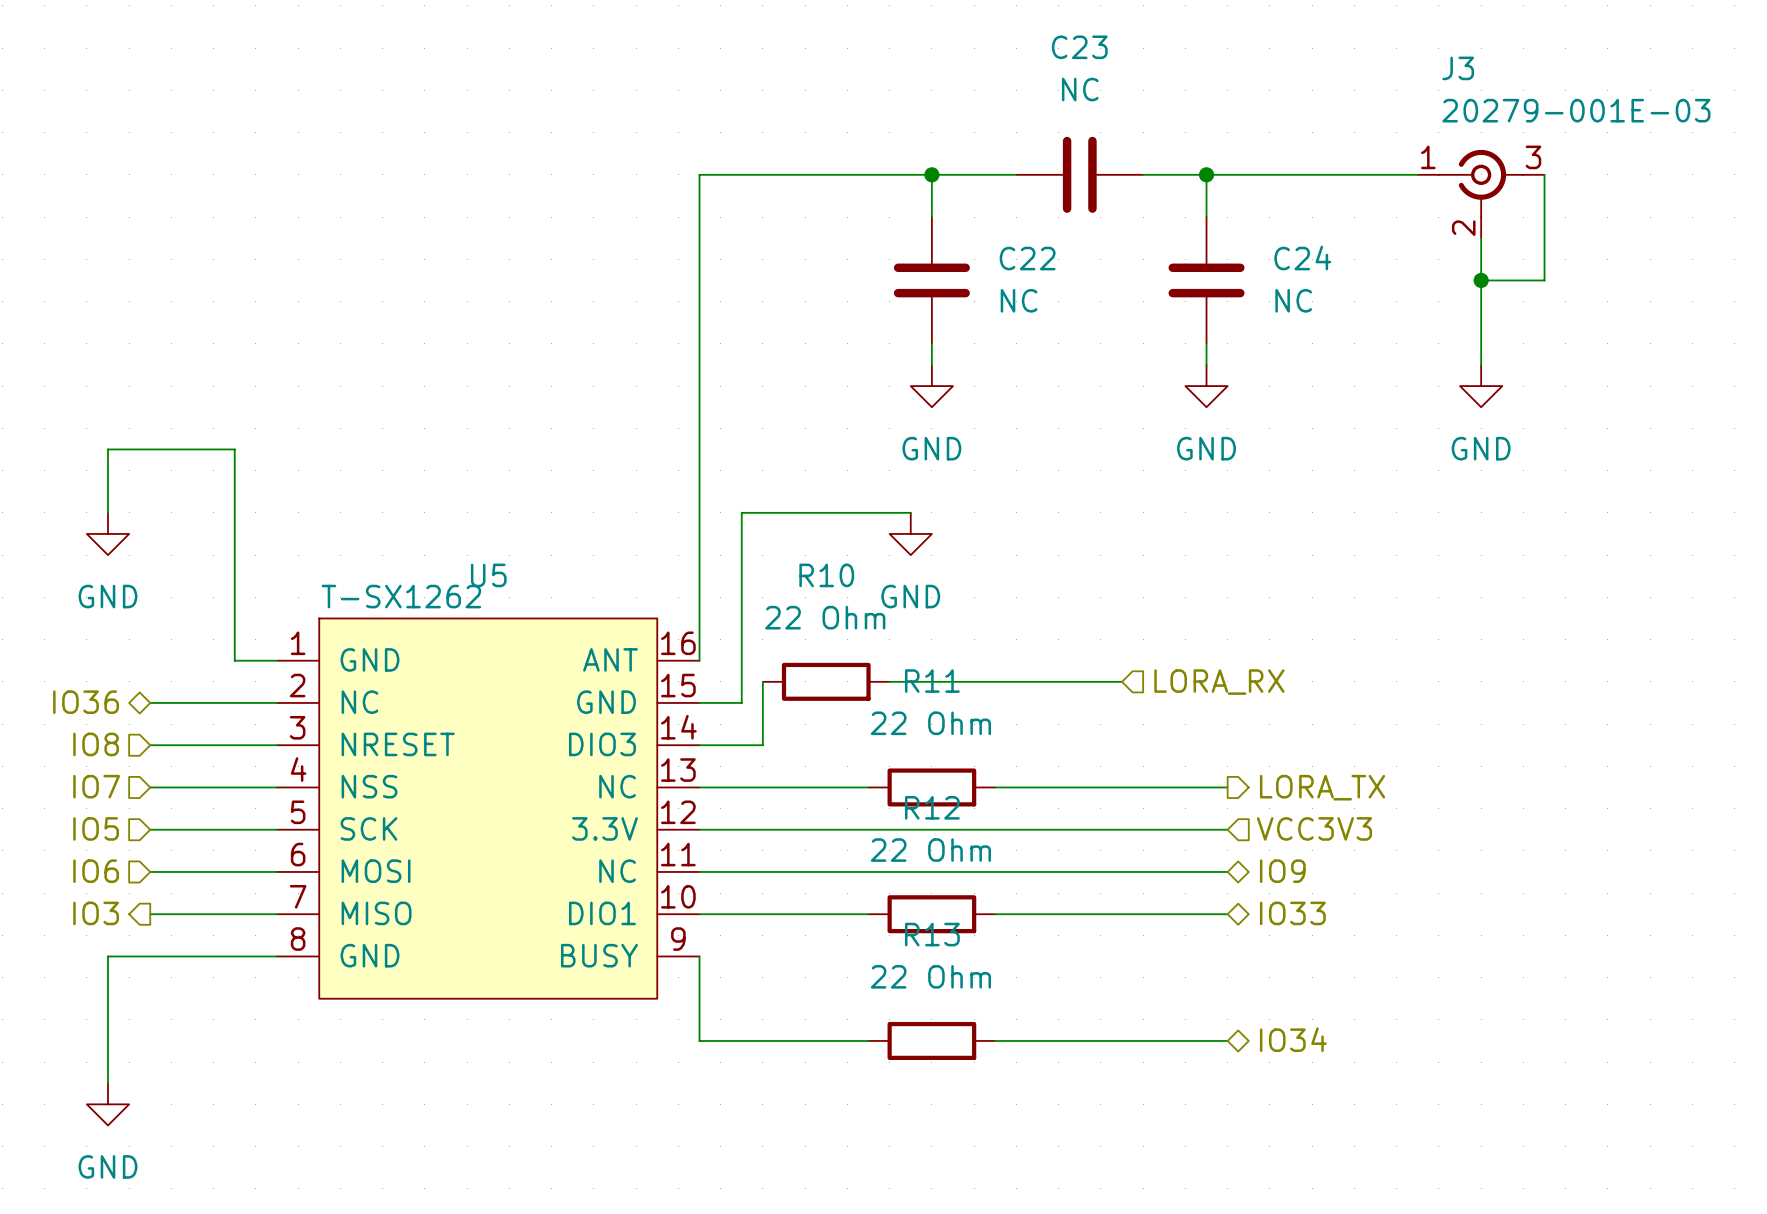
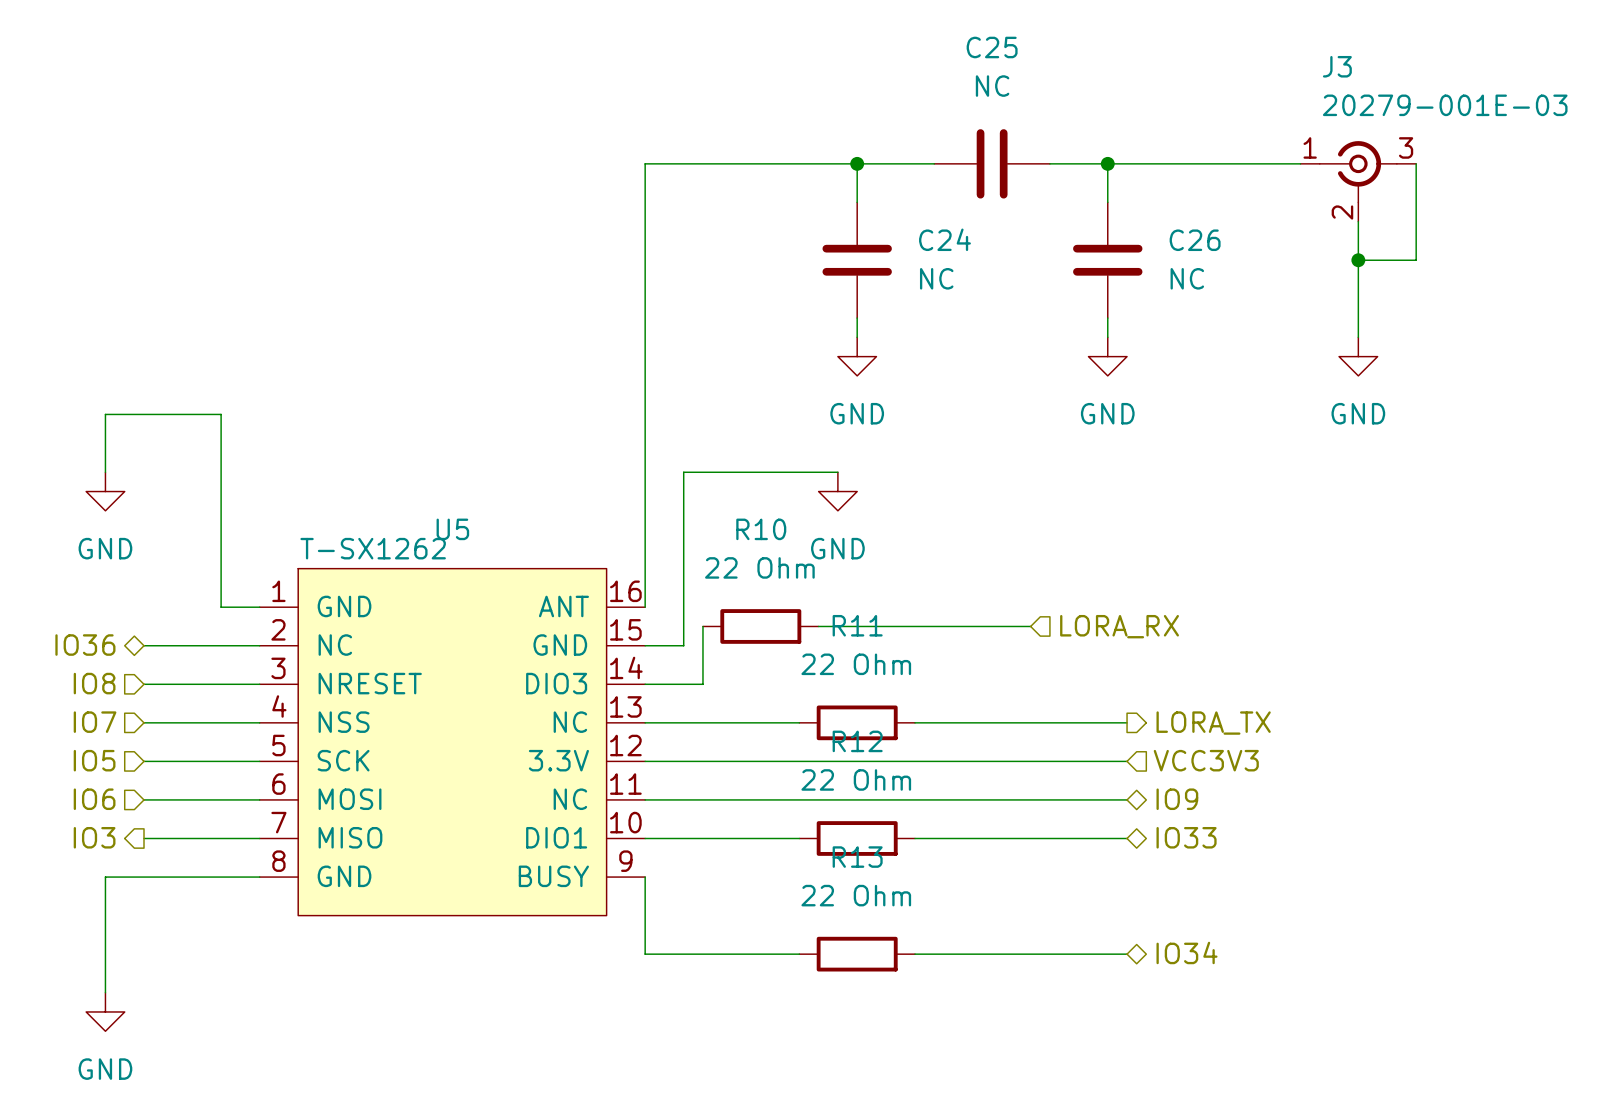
C23 name: C23 (1079, 47) -> C25 (992, 47)
C22 name: C22 (1027, 258) -> C24 (944, 239)
C24 name: C24 (1302, 258) -> C26 (1195, 240)

